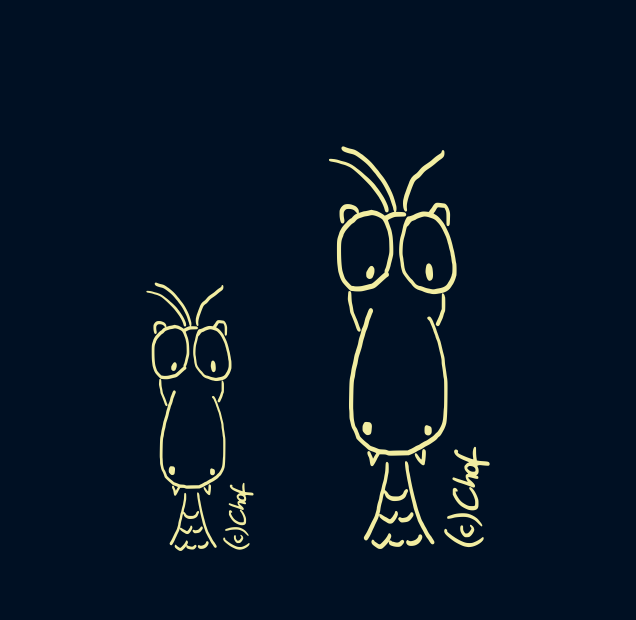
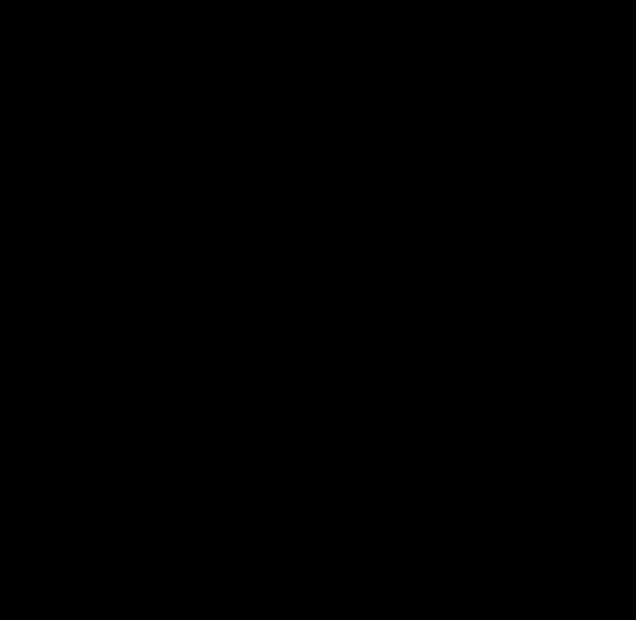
drawing: [328, 146, 490, 549] -> none
drawing: [146, 282, 254, 551] -> none

